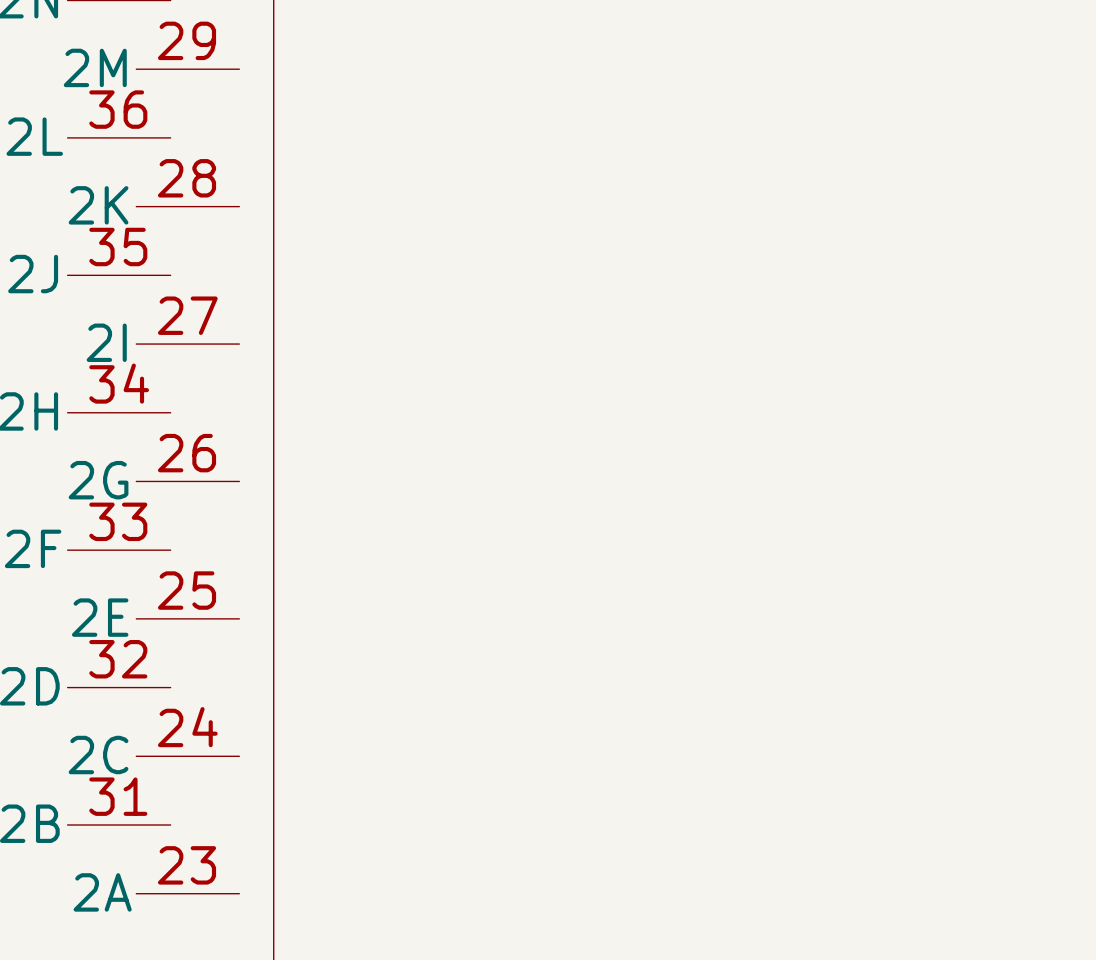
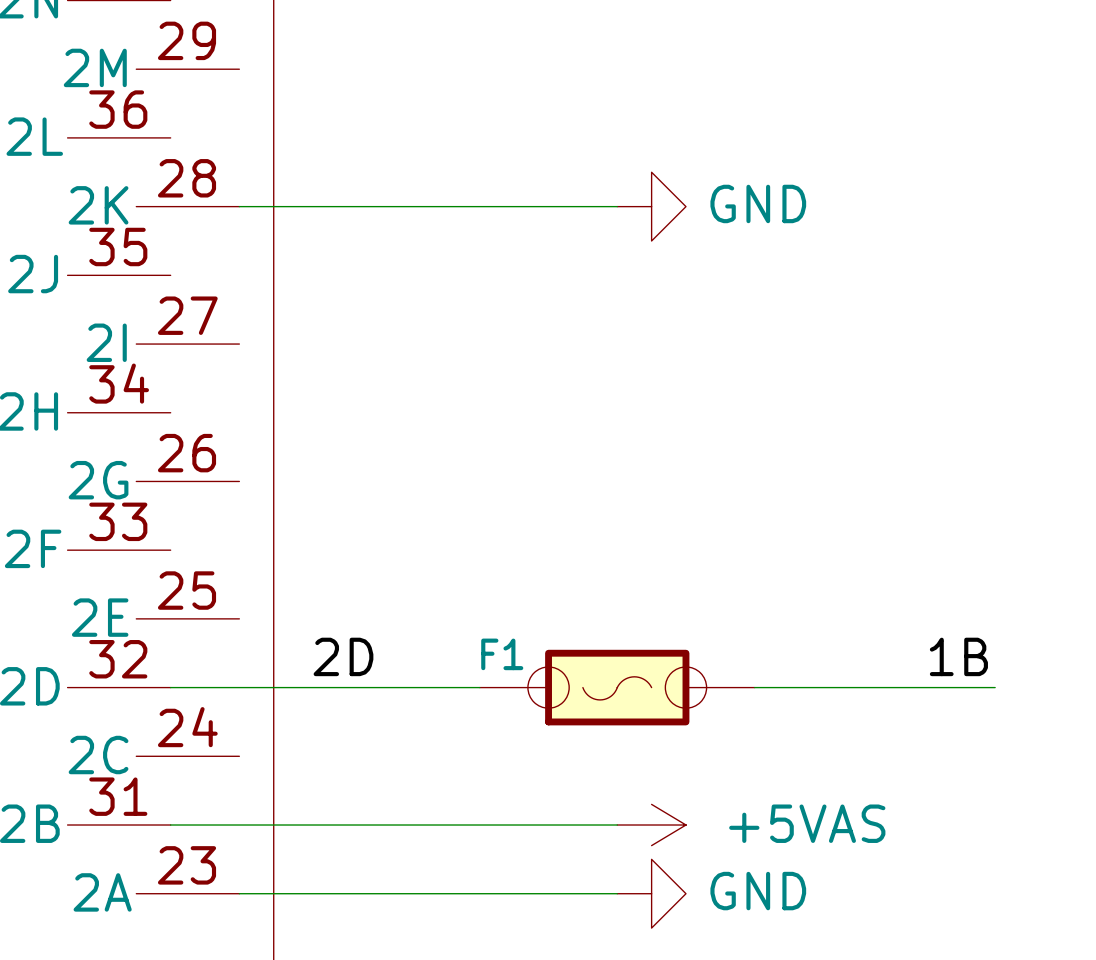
wire: none -> (239, 206) (617, 206)
power symbol: none -> GND (651, 206)
label: none -> 2D (343, 656)
label: none -> 1B (958, 656)
wire: none -> (170, 687) (479, 687)
F1: none -> (617, 687)
wire: none -> (754, 687) (995, 687)
wire: none -> (170, 825) (617, 825)
power symbol: none -> +5VAS (651, 825)
wire: none -> (239, 893) (617, 893)
power symbol: none -> GND (651, 893)

